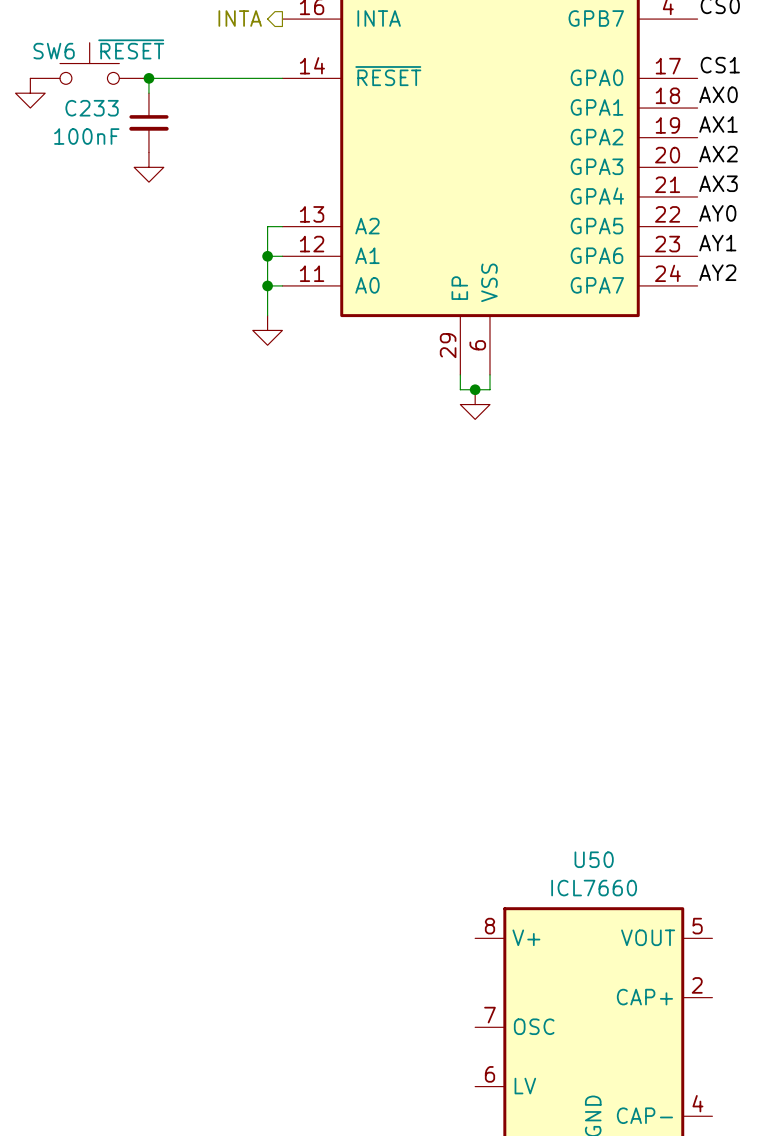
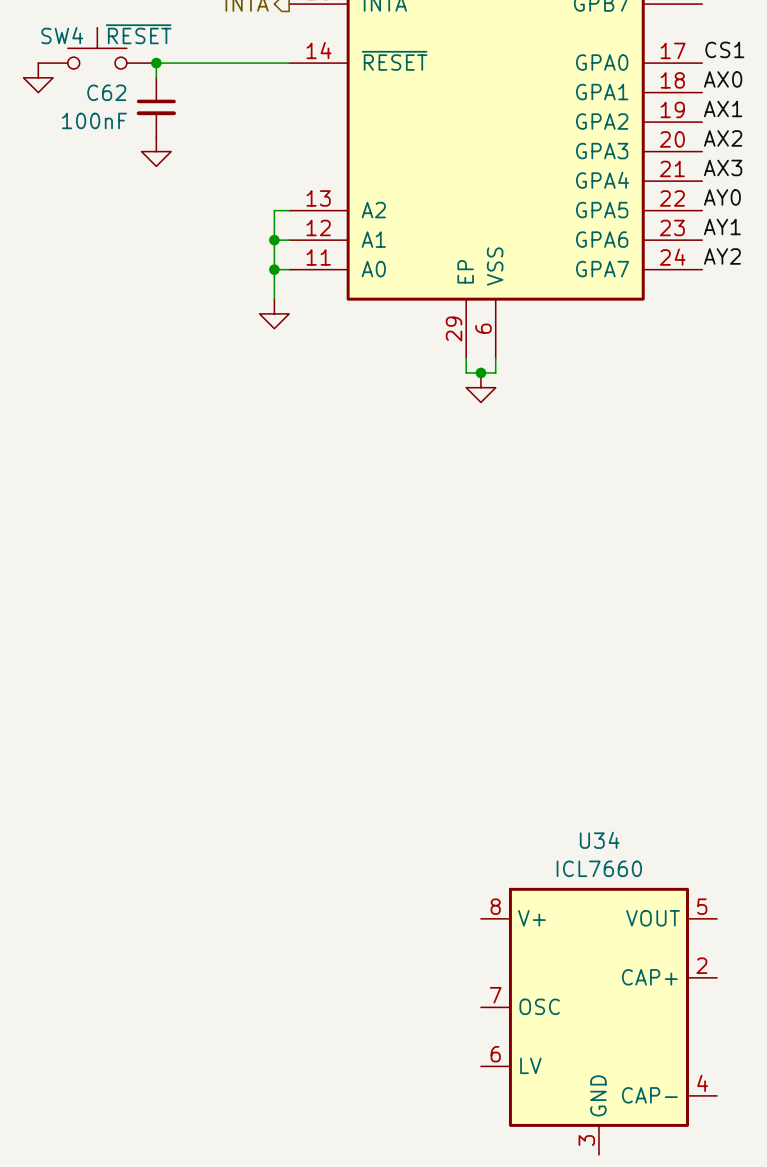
SW6 name: SW6 (54, 51) -> SW4 (62, 35)
C233 name: C233 (92, 108) -> C62 (106, 92)
U50 name: U50 (594, 859) -> U34 (599, 840)

